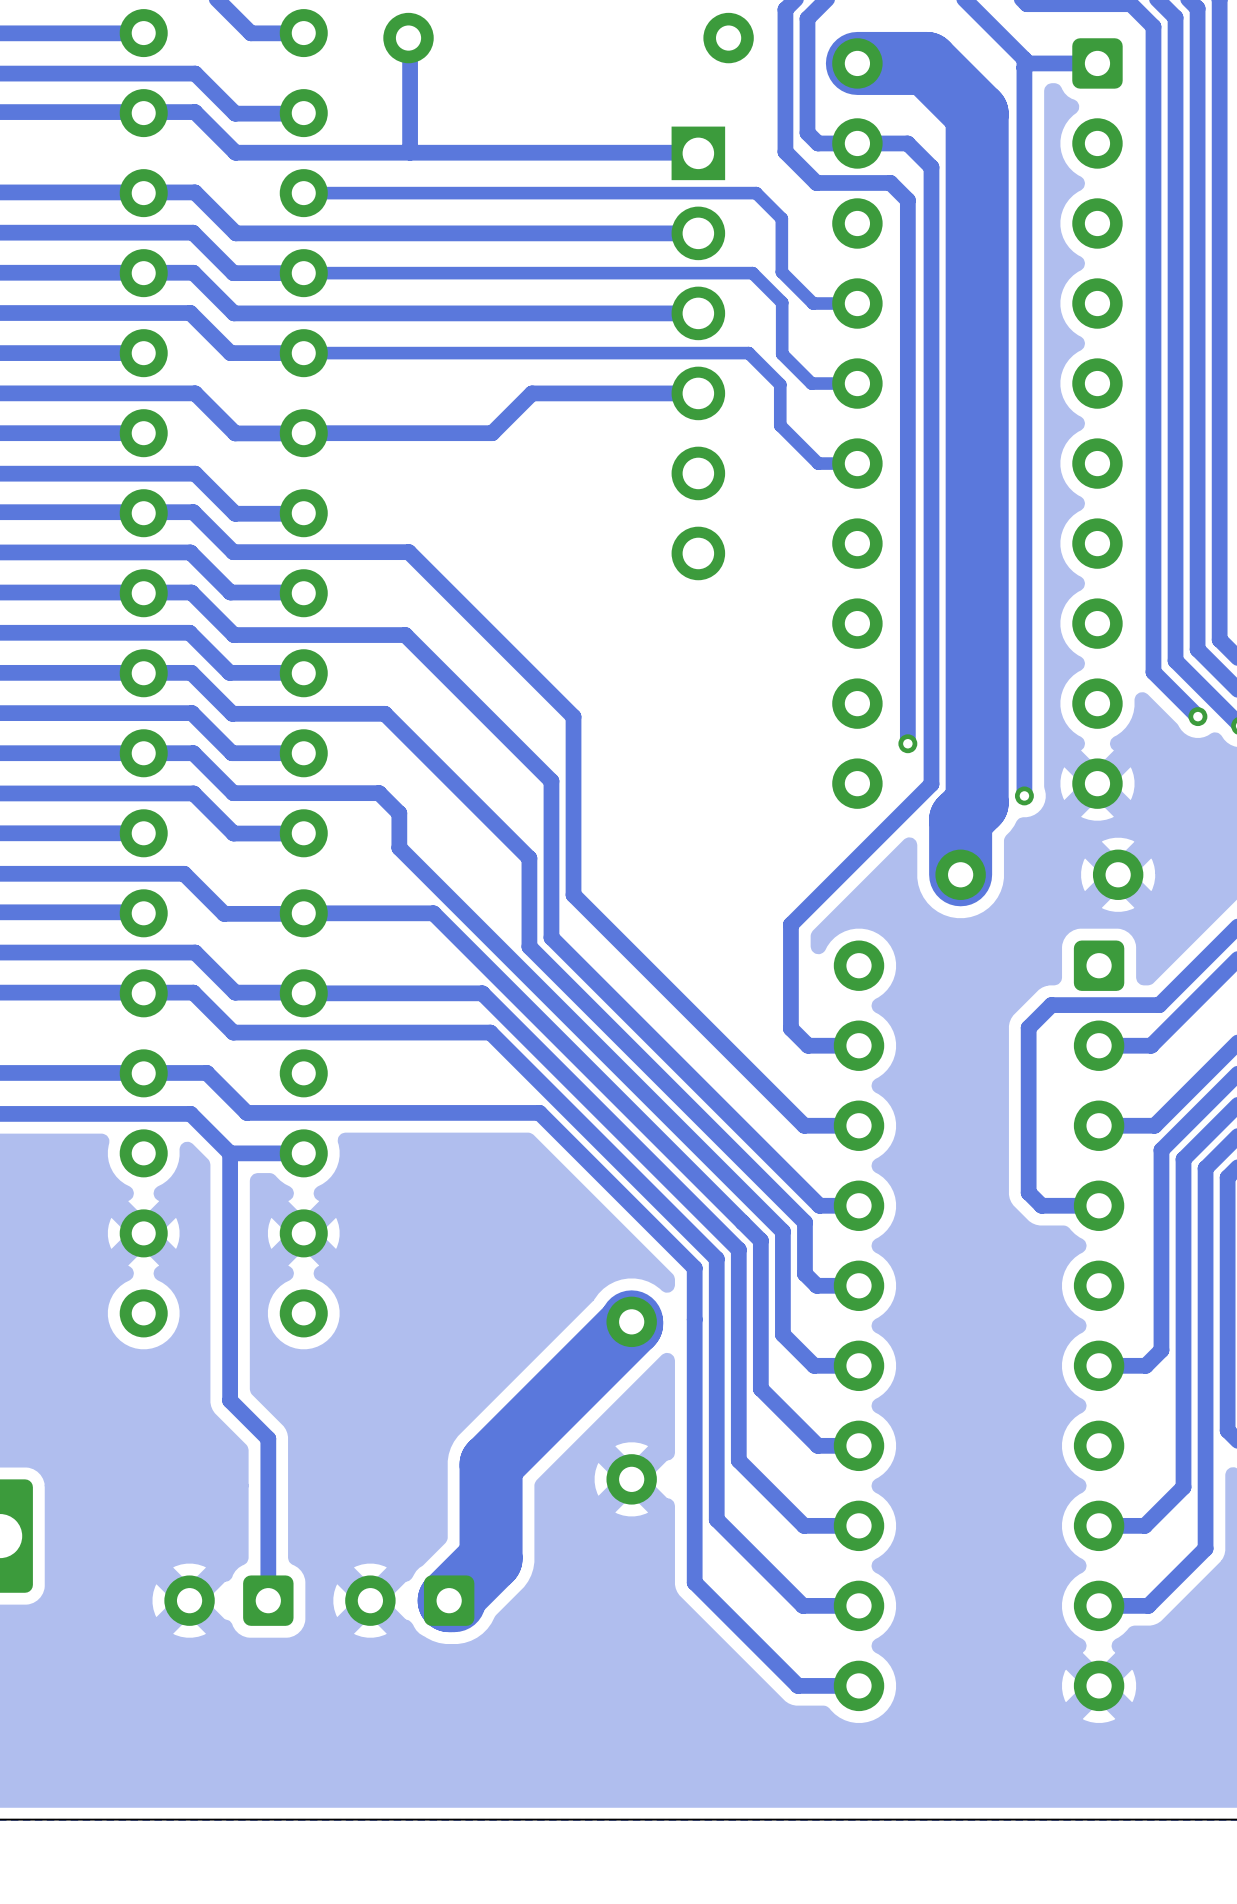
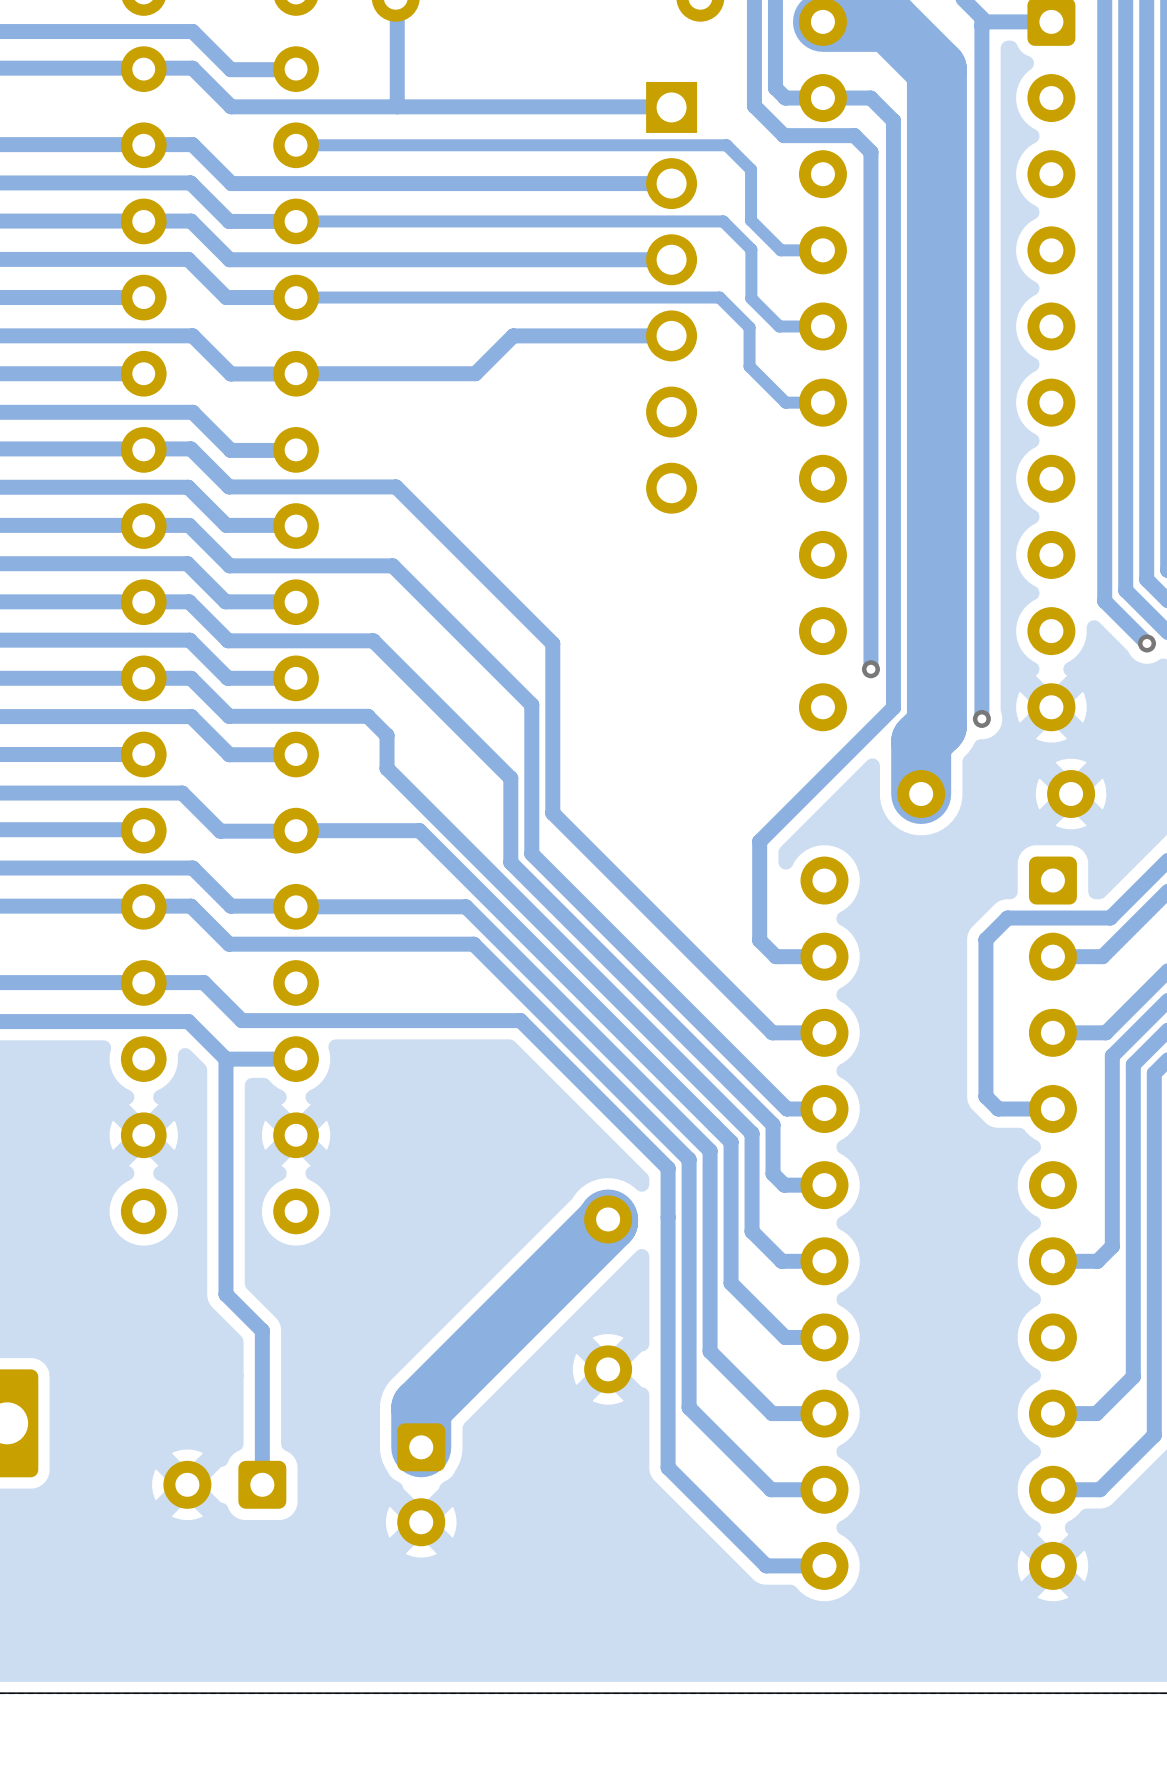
track: (491, 1464) (491, 1558) (449, 1600) (454, 1600) -> (474, 1355) (421, 1408) (421, 1447)
part rotation: 0° (409, 1600) -> 90° counterclockwise (421, 1484)

